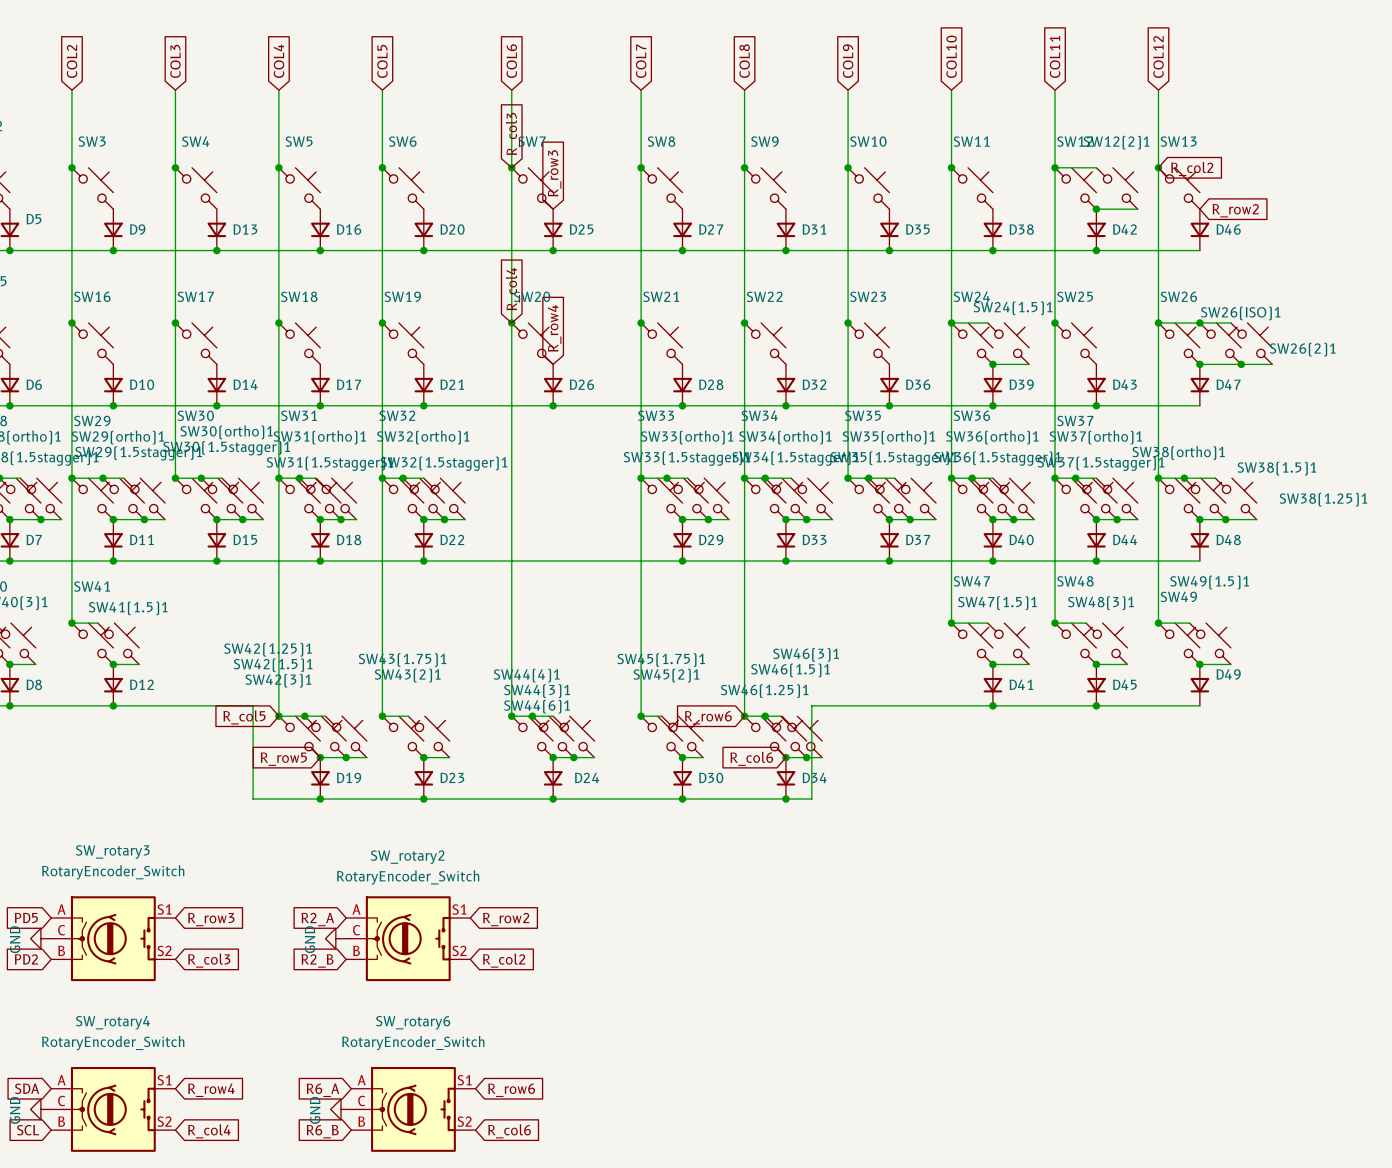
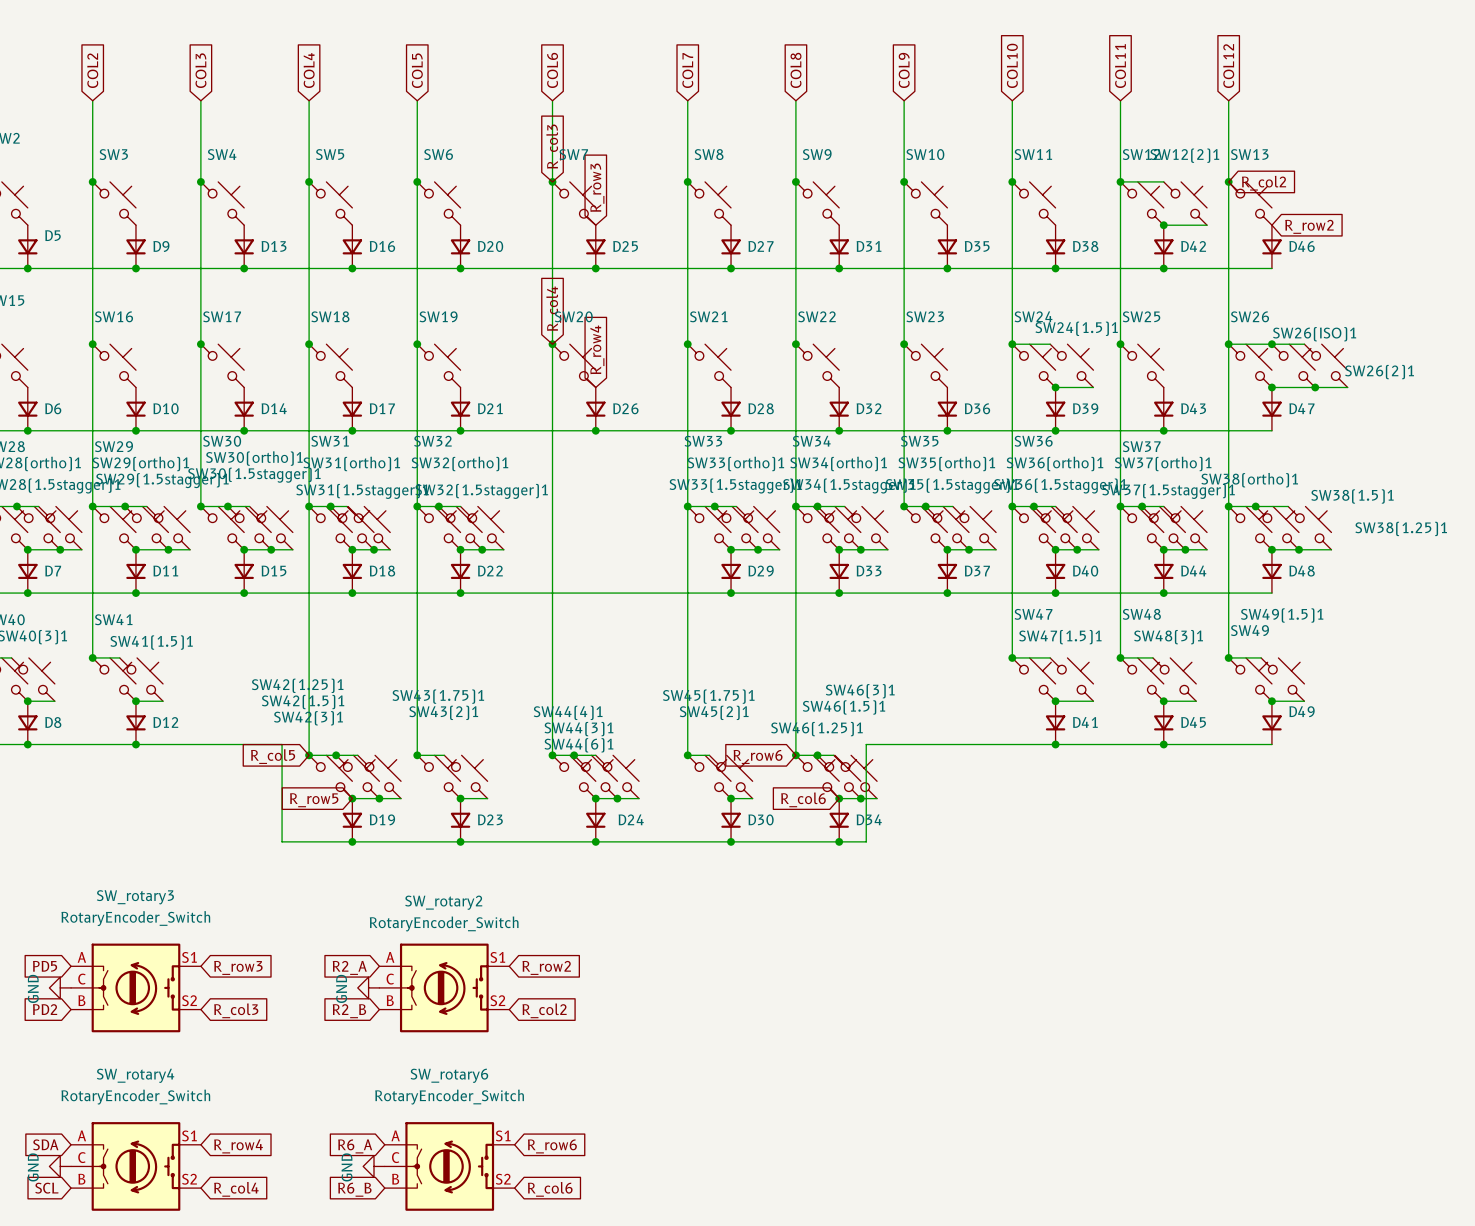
SW_rotary3 symbol: [51, 896, 176, 982] -> [71, 943, 201, 1033]
SW_rotary2 symbol: [346, 896, 471, 982] -> [379, 943, 510, 1033]
SW_rotary4 symbol: [51, 1067, 176, 1152] -> [71, 1122, 201, 1211]
SW_rotary6 symbol: [351, 1067, 476, 1152] -> [384, 1122, 515, 1211]

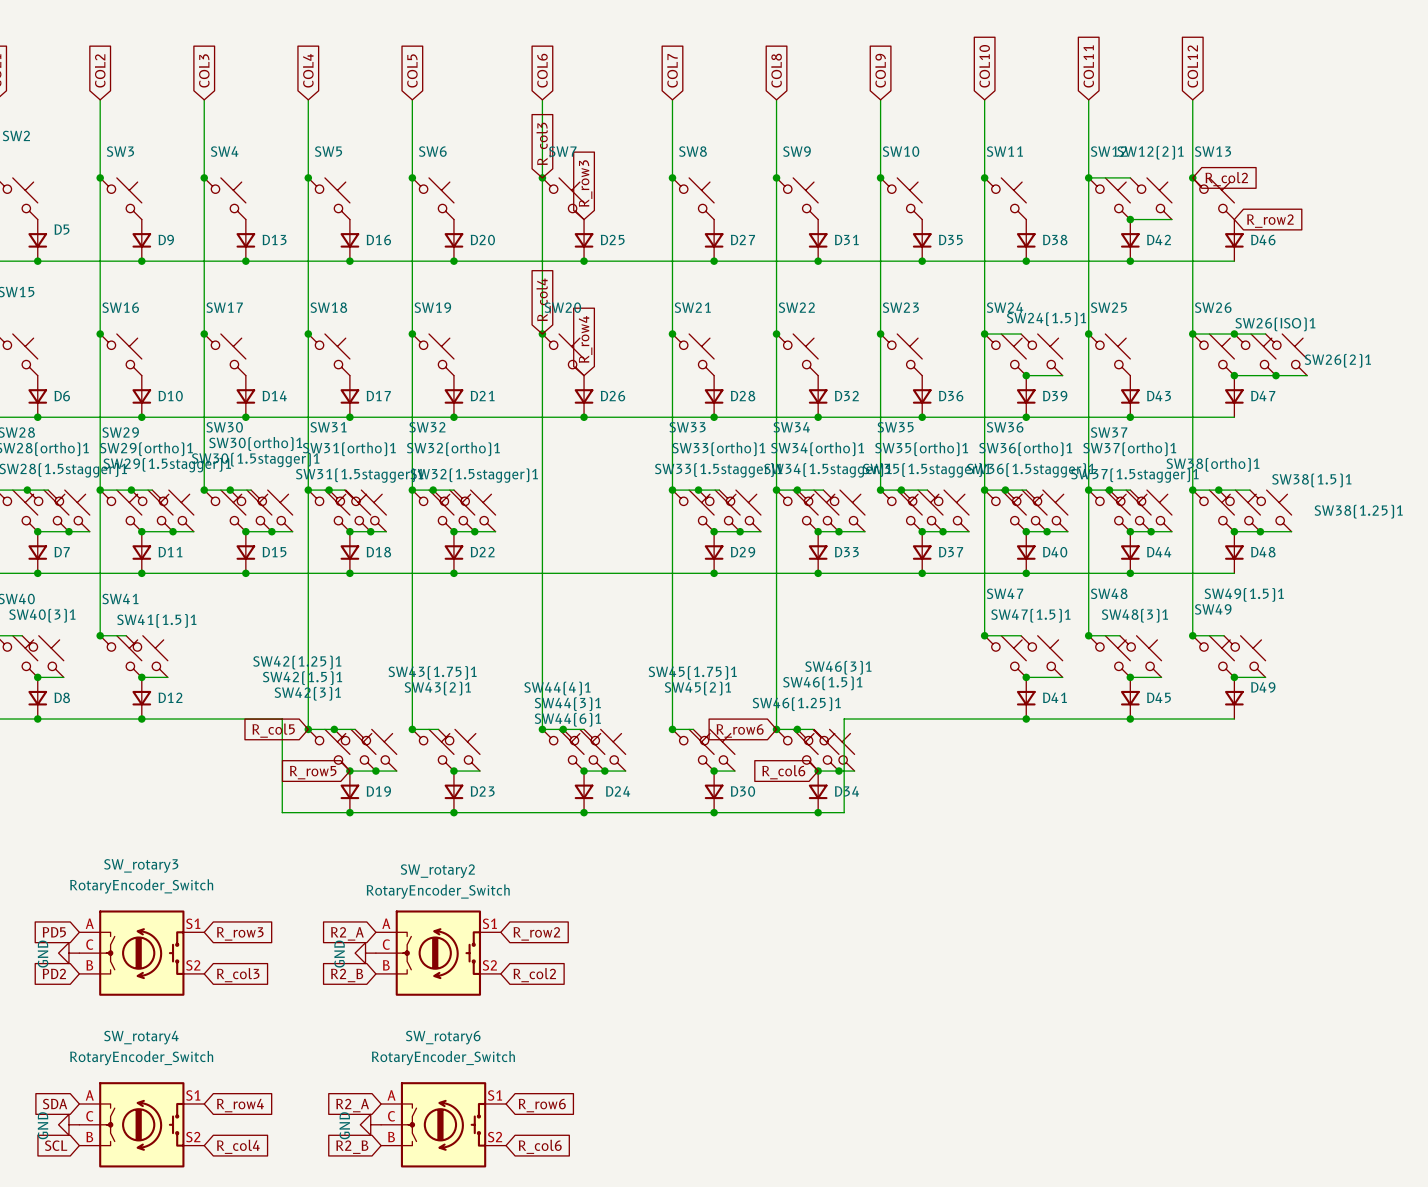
global label: R6_A (355, 1146) -> R2_A (352, 1105)
global label: R6_B (354, 1189) -> R2_B (352, 1147)

